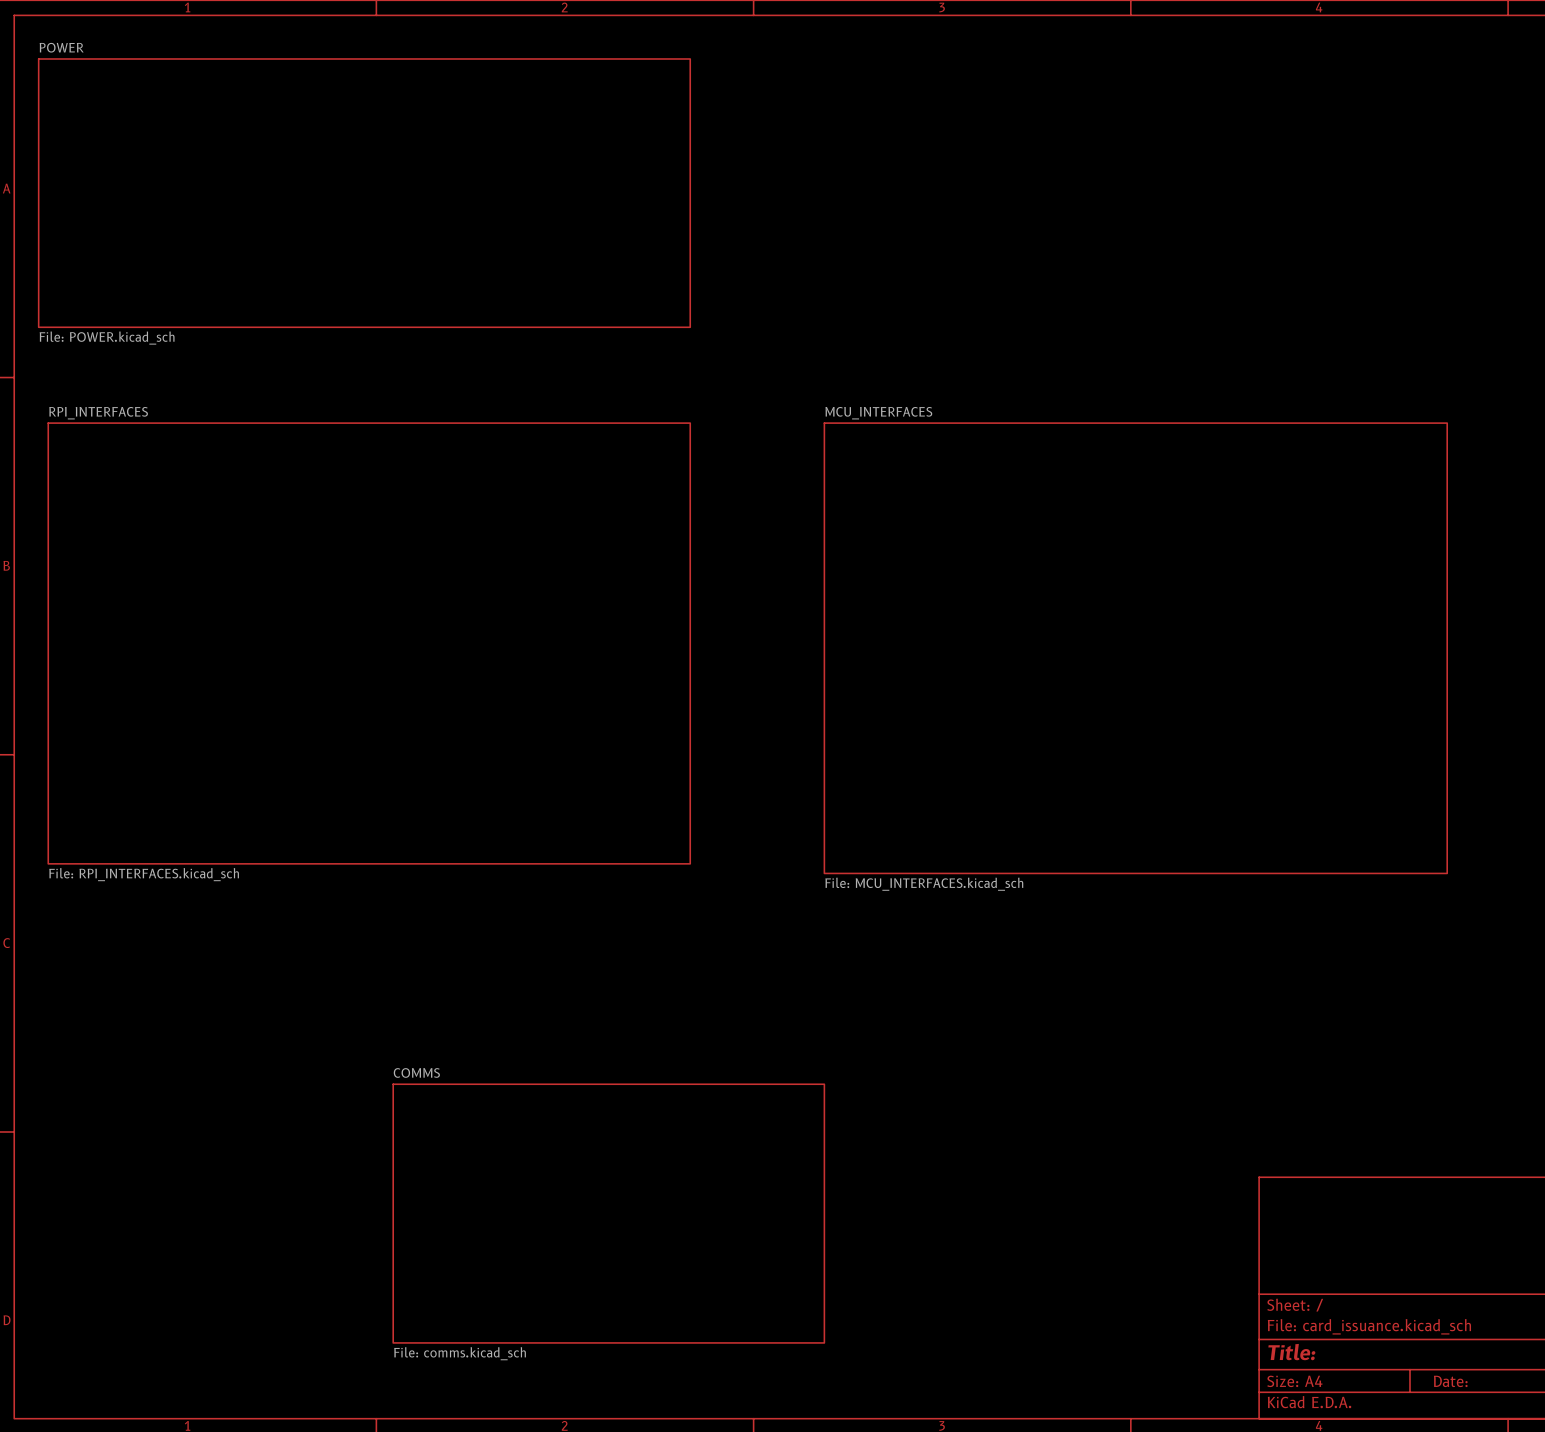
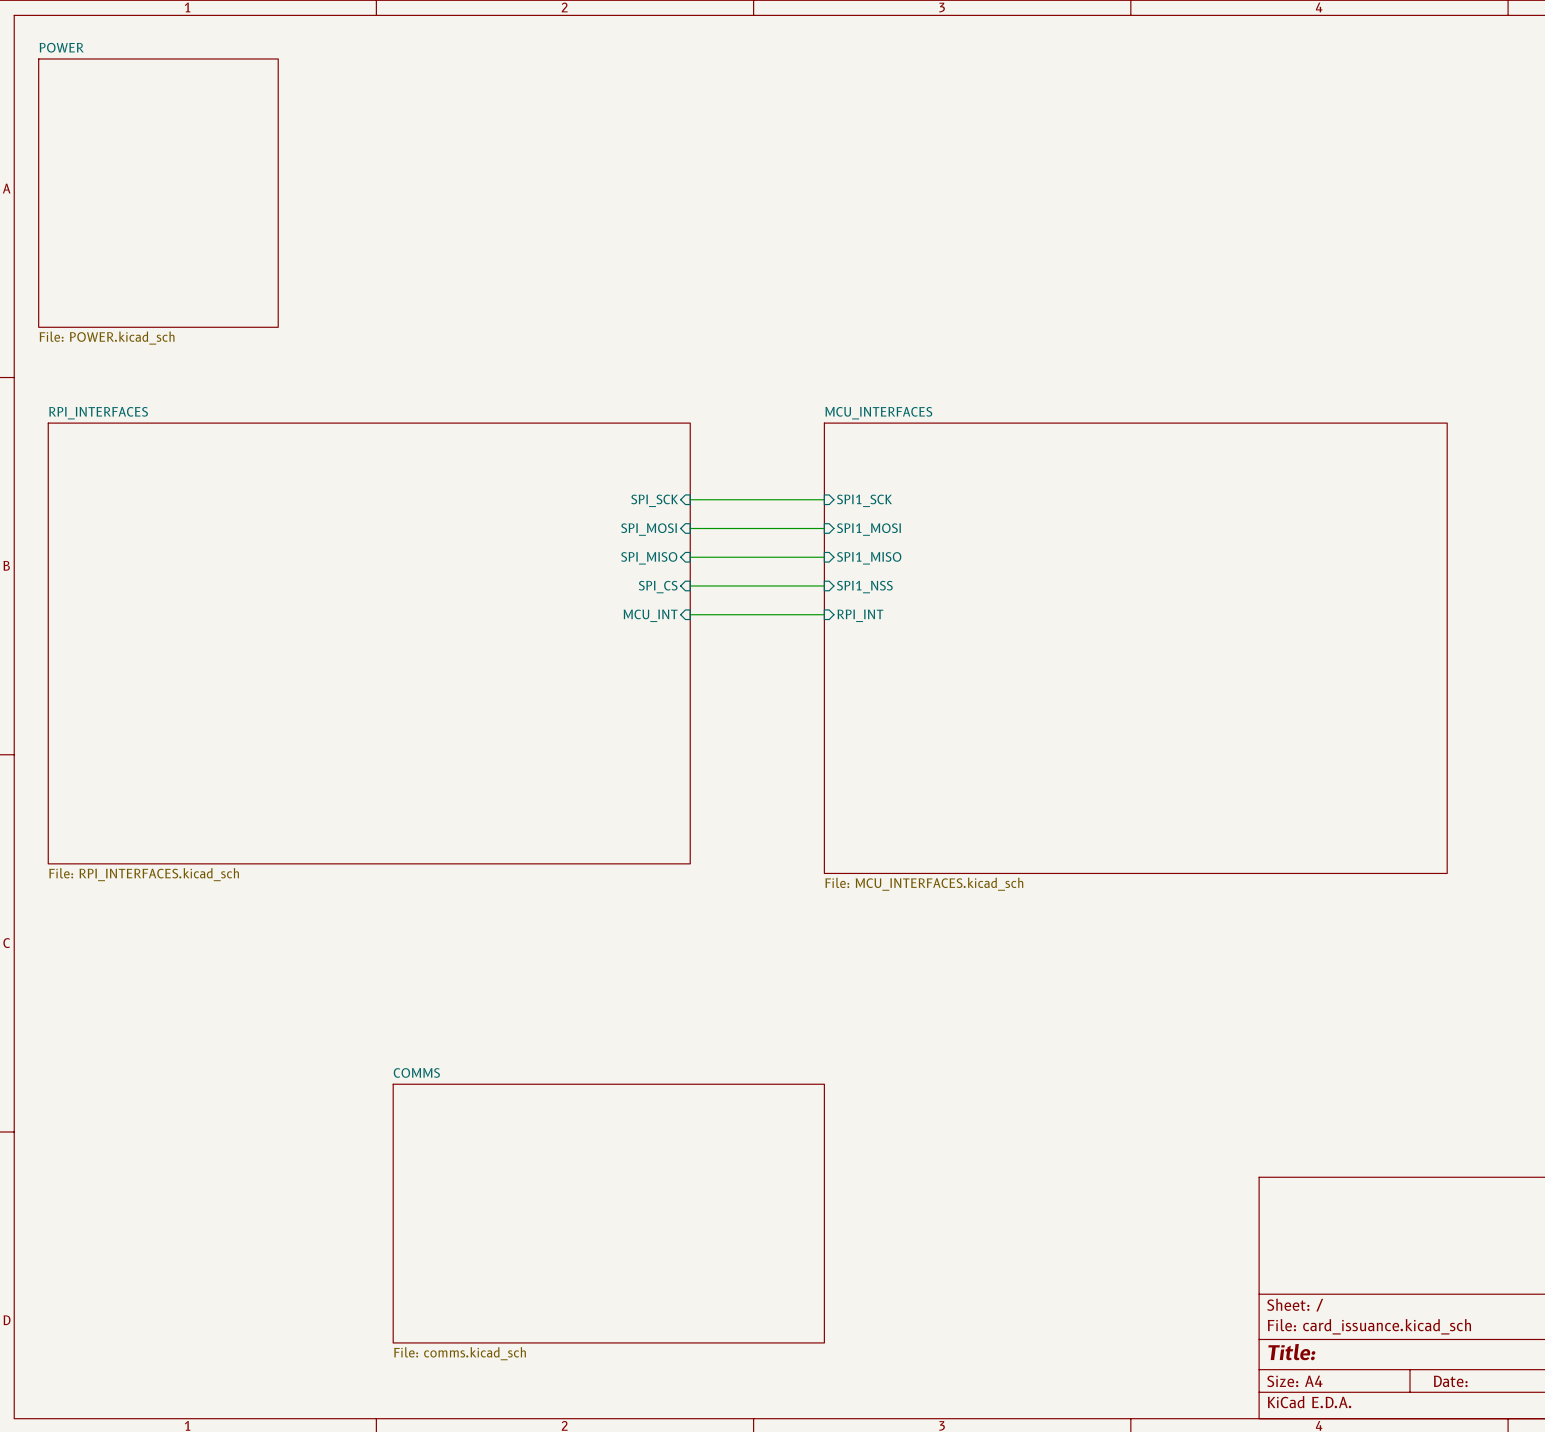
sheet POWER: none -> File: POWER.kicad_sch (158, 193)
sheet POWER: File: POWER.kicad_sch (364, 193) -> none
wire: none -> (690, 499) (824, 499)
sheet pin: none -> SPI_SCK (654, 500)
sheet pin: none -> SPI1_SCK (864, 500)
wire: none -> (690, 528) (824, 528)
sheet pin: none -> SPI_MOSI (649, 529)
sheet pin: none -> SPI1_MOSI (868, 529)
wire: none -> (690, 557) (824, 557)
sheet pin: none -> SPI_MISO (649, 558)
sheet pin: none -> SPI1_MISO (869, 558)
wire: none -> (690, 585) (824, 585)
sheet pin: none -> SPI_CS (658, 587)
sheet pin: none -> SPI1_NSS (864, 587)
wire: none -> (690, 614) (824, 614)
sheet pin: none -> MCU_INT (650, 615)
sheet pin: none -> RPI_INT (860, 615)

